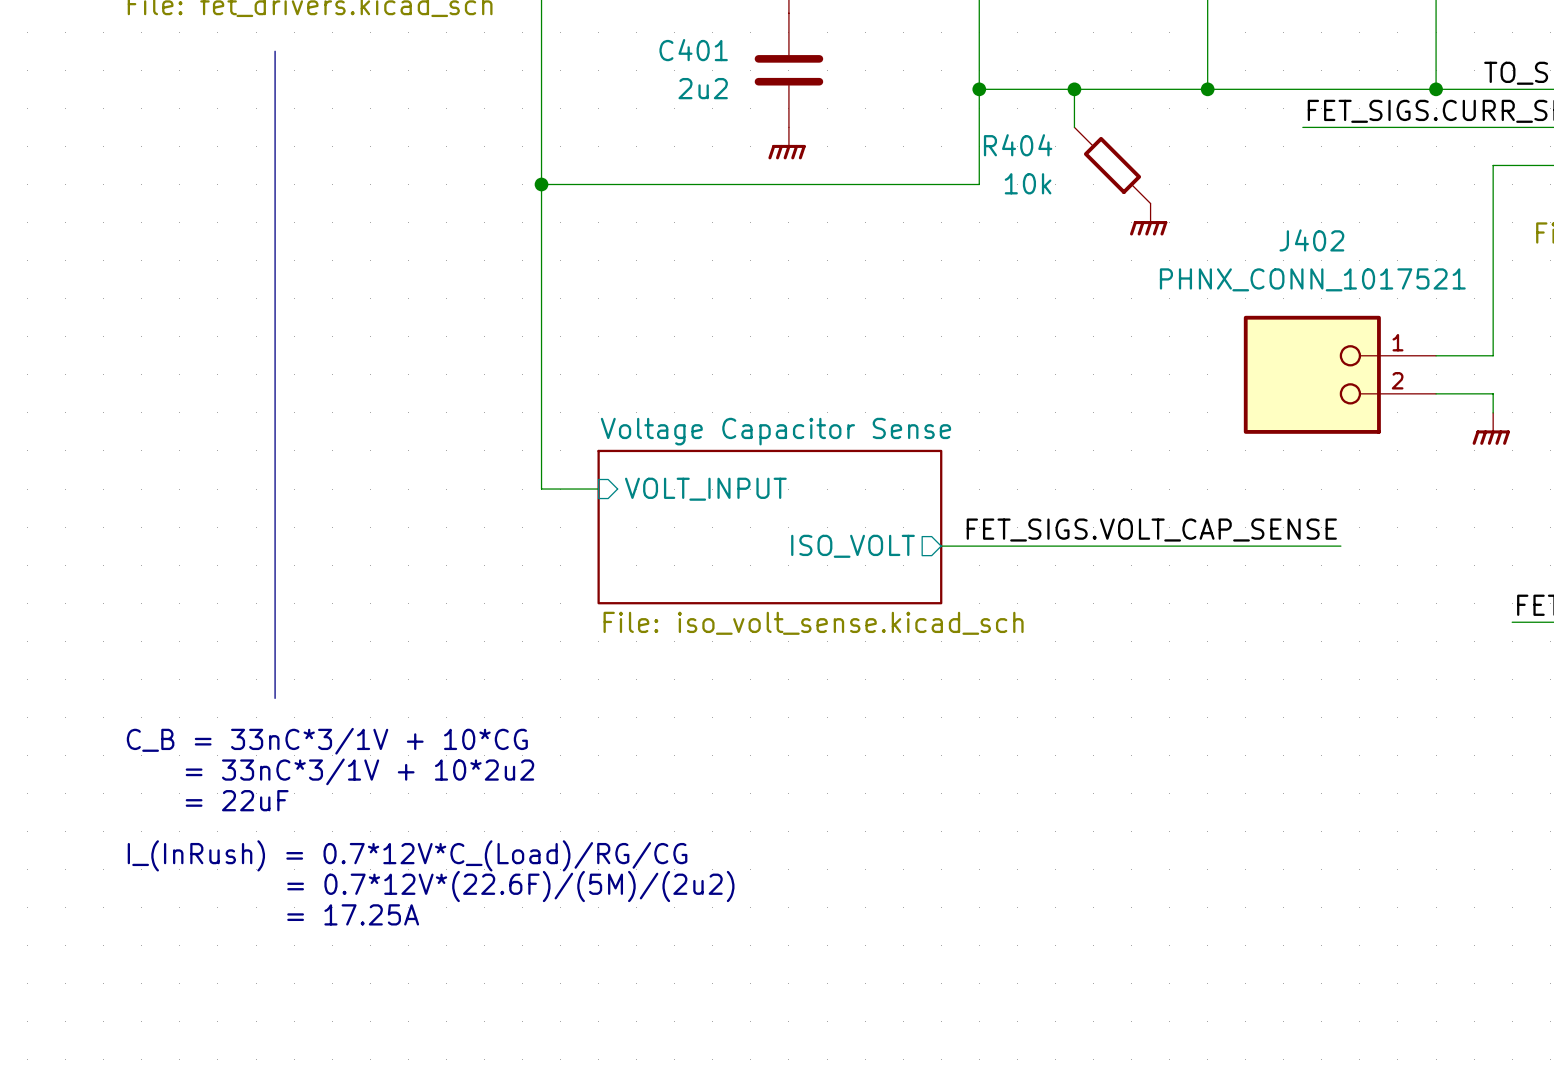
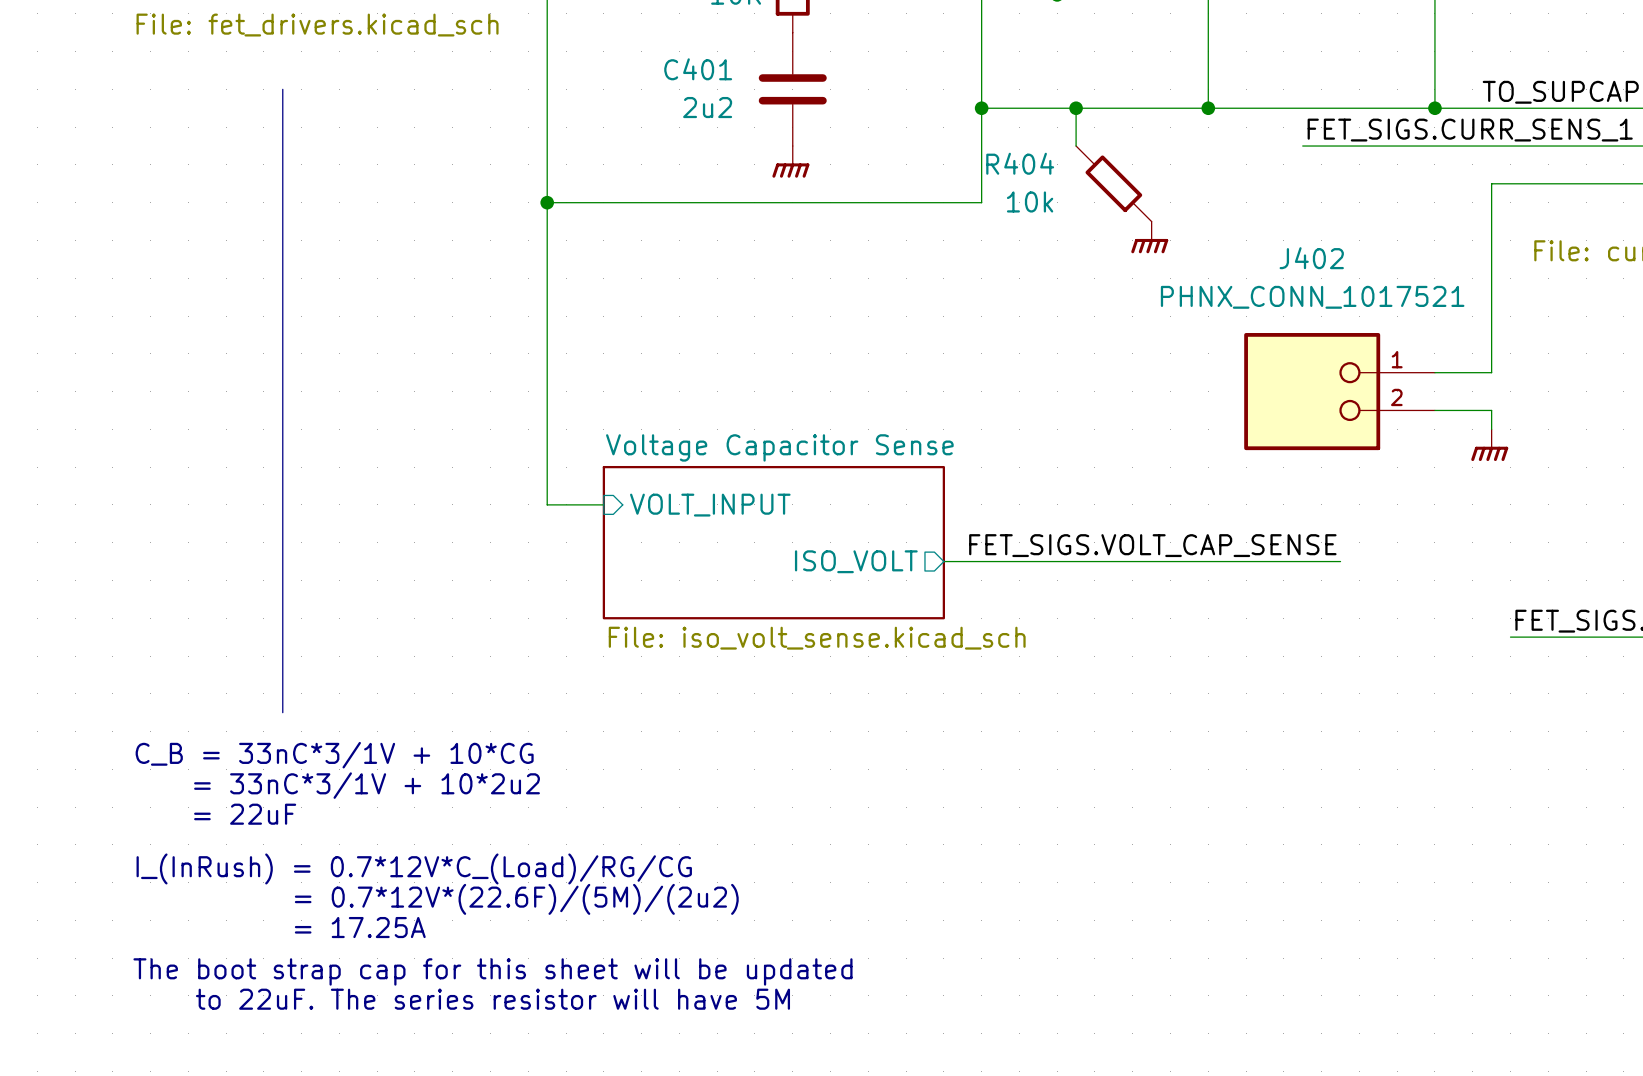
line: (275, 51) (275, 70) -> none
text: none -> The boot strap cap for this sheet will be updated (492, 971)
text: none -> to 22uF. The series resistor will have 5M (492, 999)

